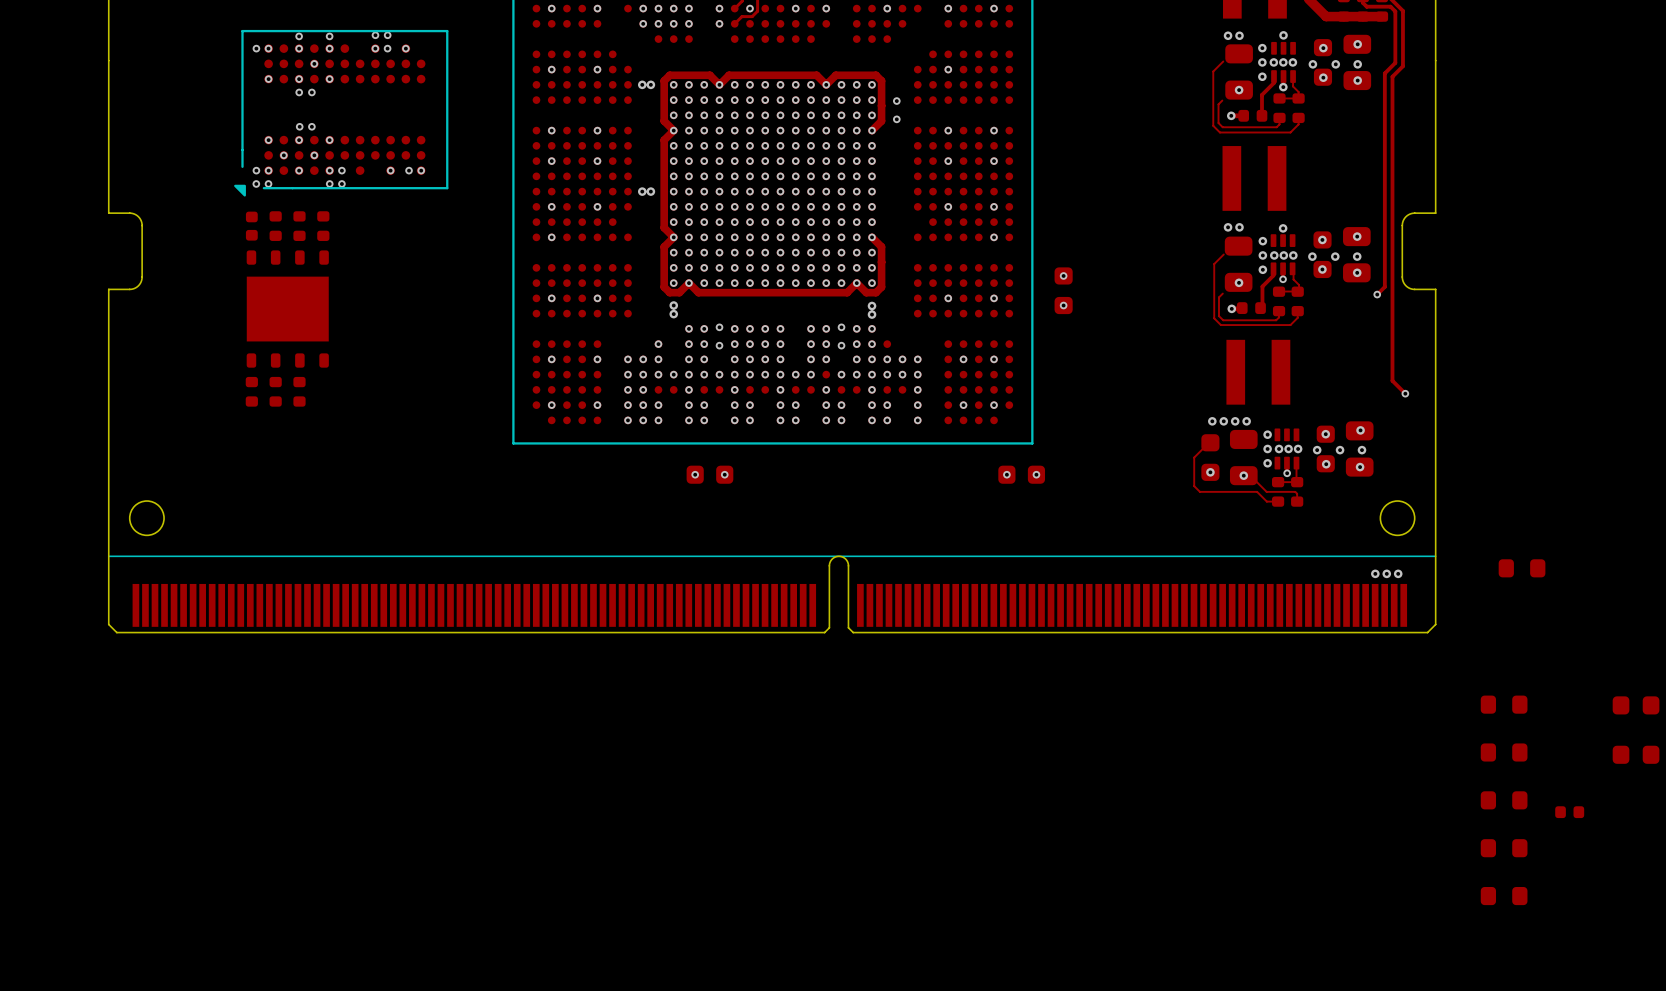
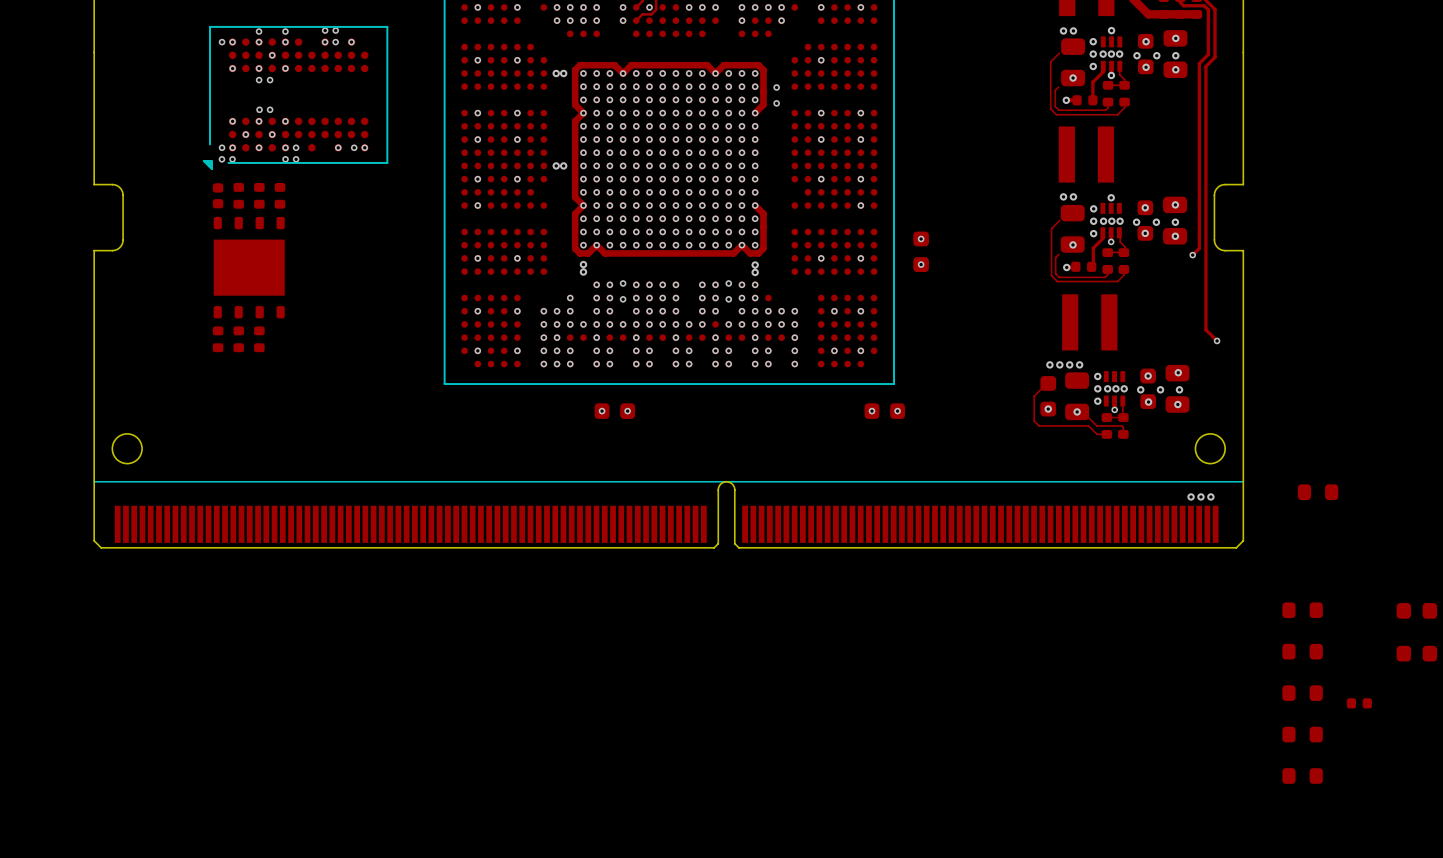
via: none -> (702, 7)
via: none -> (741, 7)
via: none -> (755, 7)
via: none -> (781, 7)
via: none -> (741, 20)
via: none -> (781, 20)

